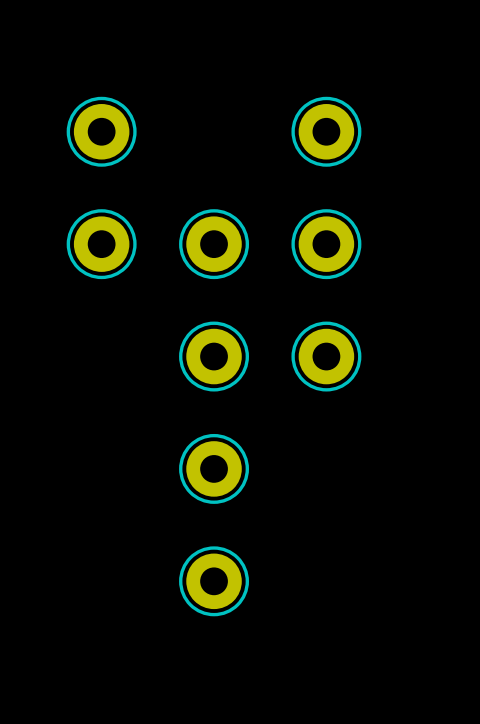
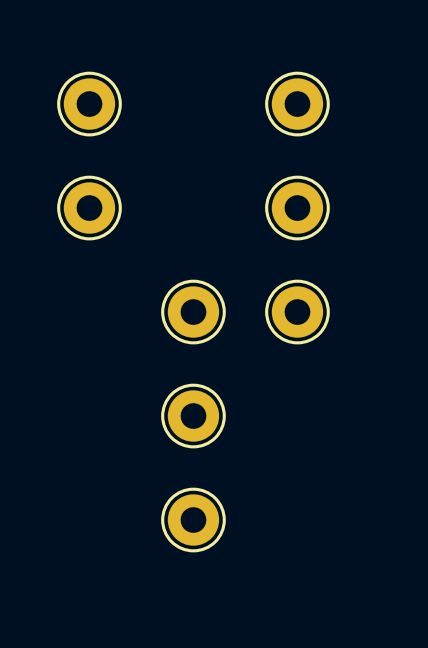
part: (214, 244) -> none

